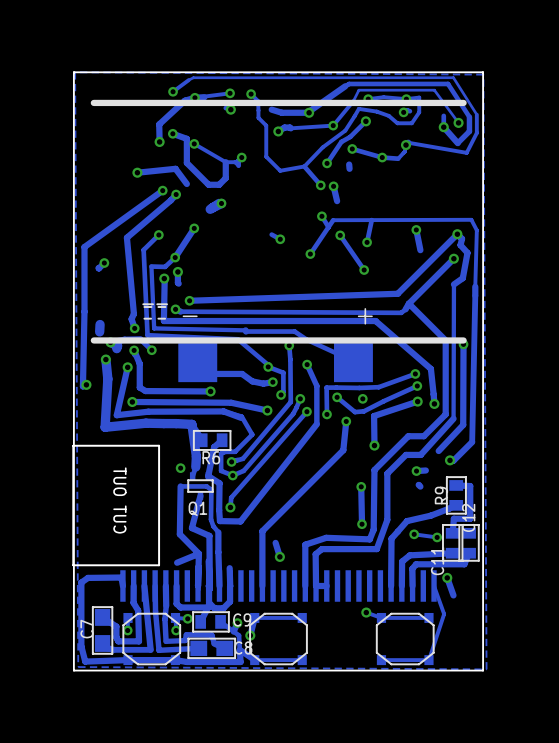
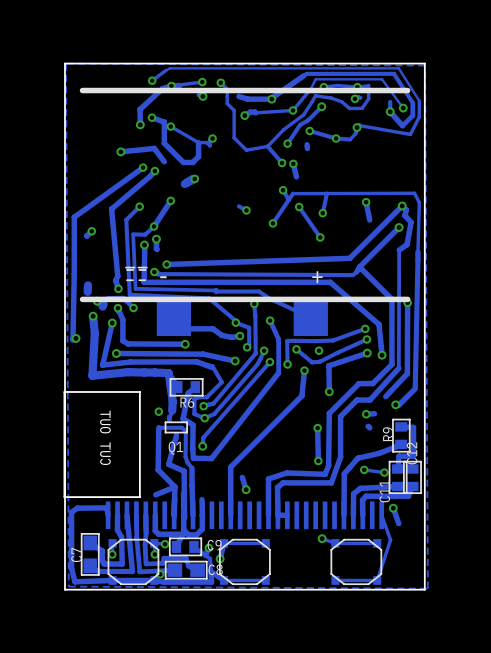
via: none -> (160, 574)

